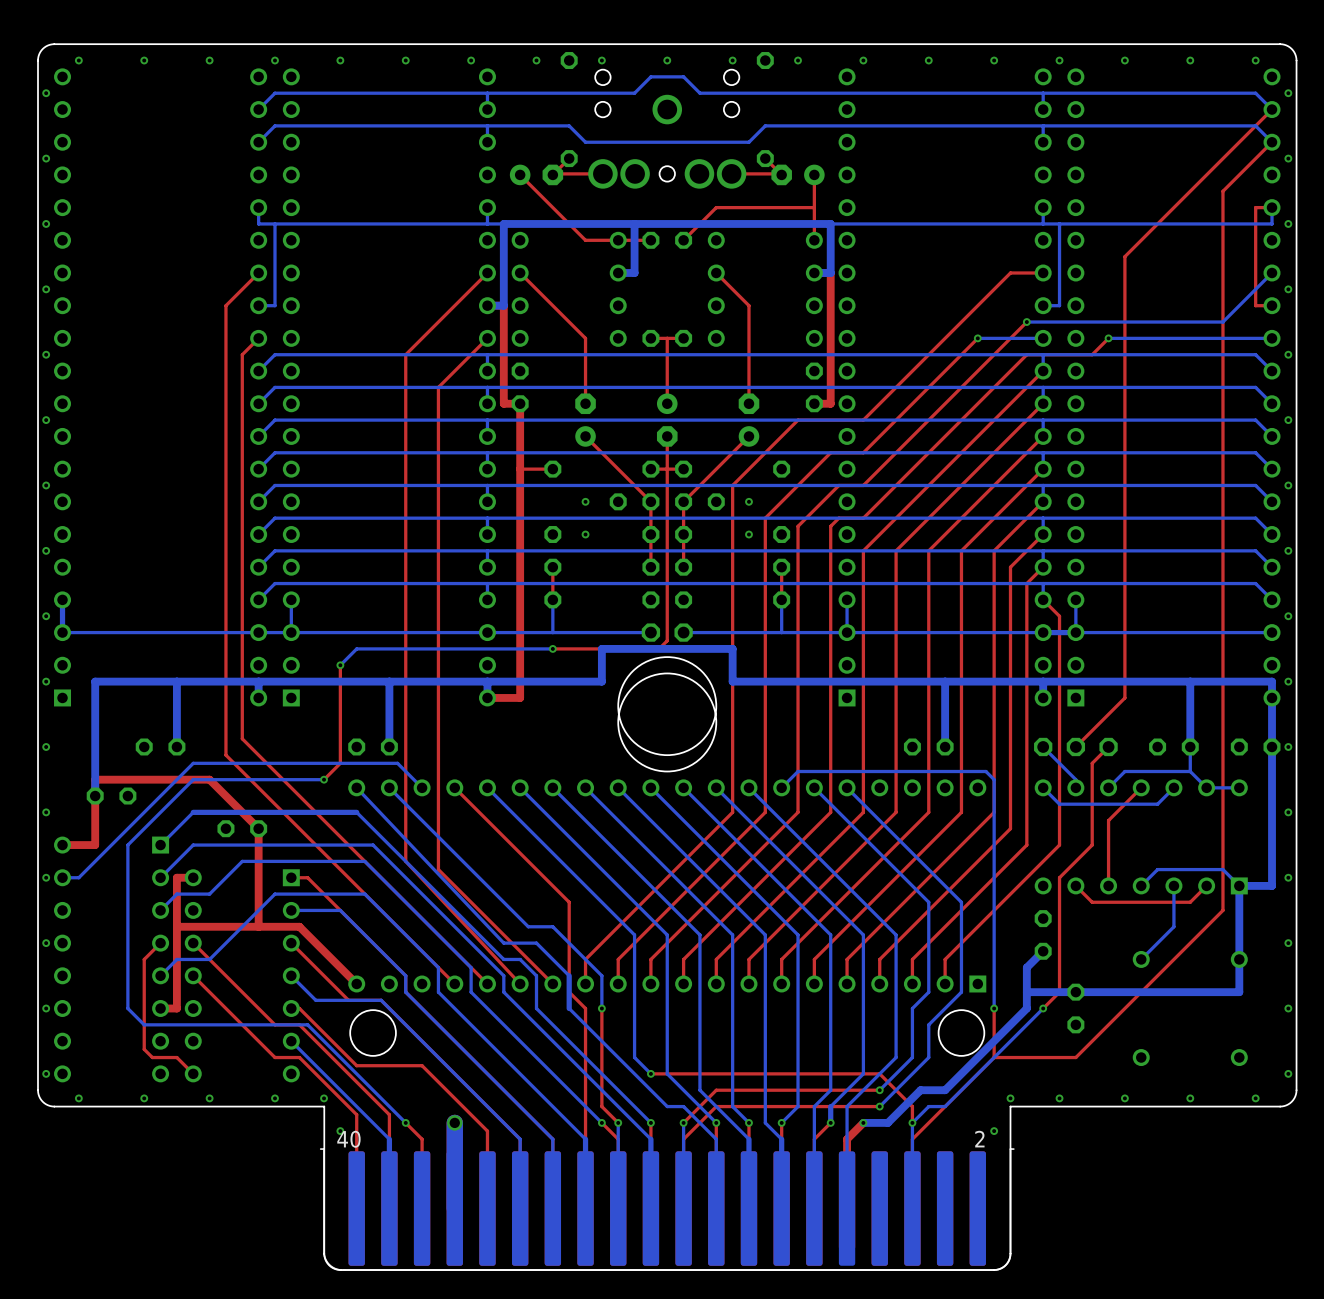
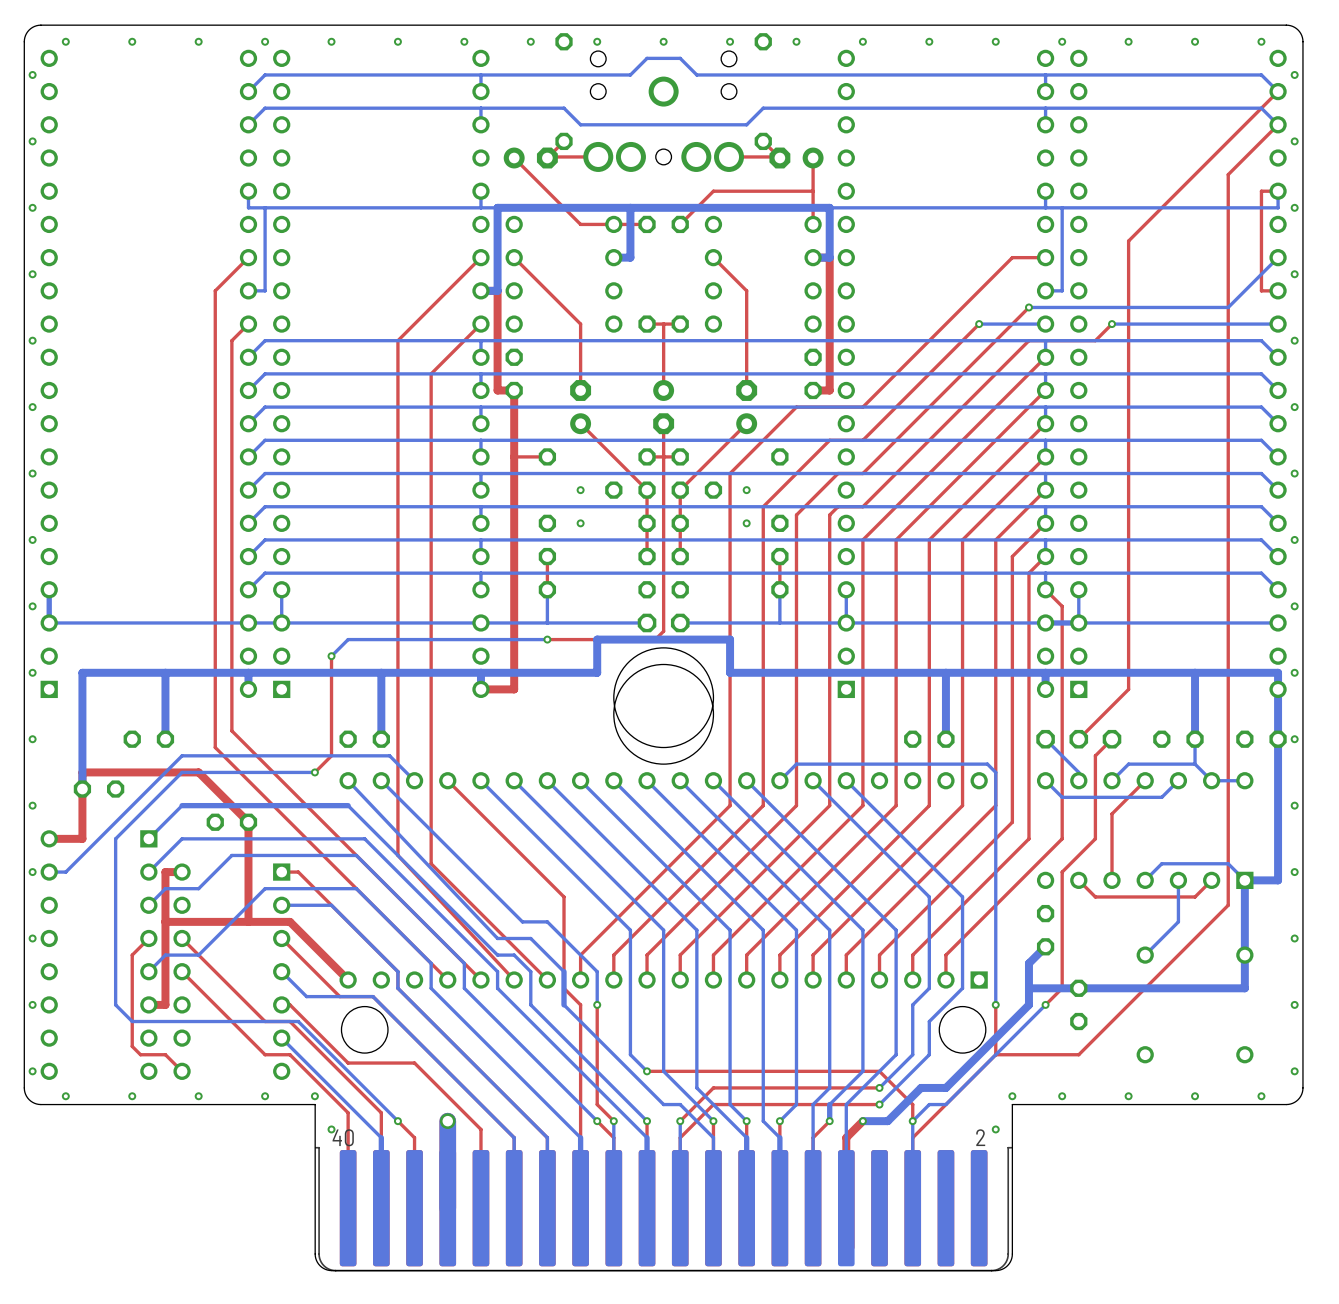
part footprint: [319, 1148, 1015, 1271] -> [314, 1146, 1013, 1272]

